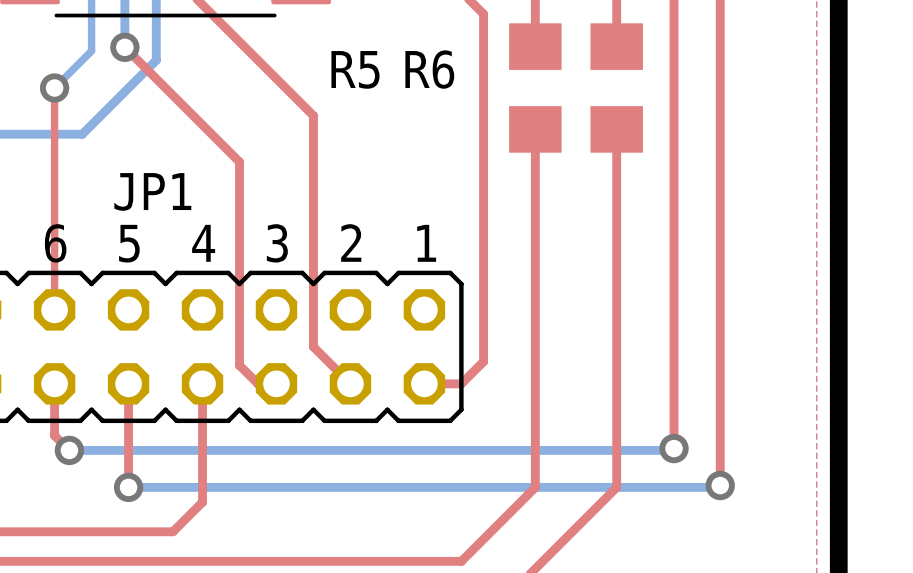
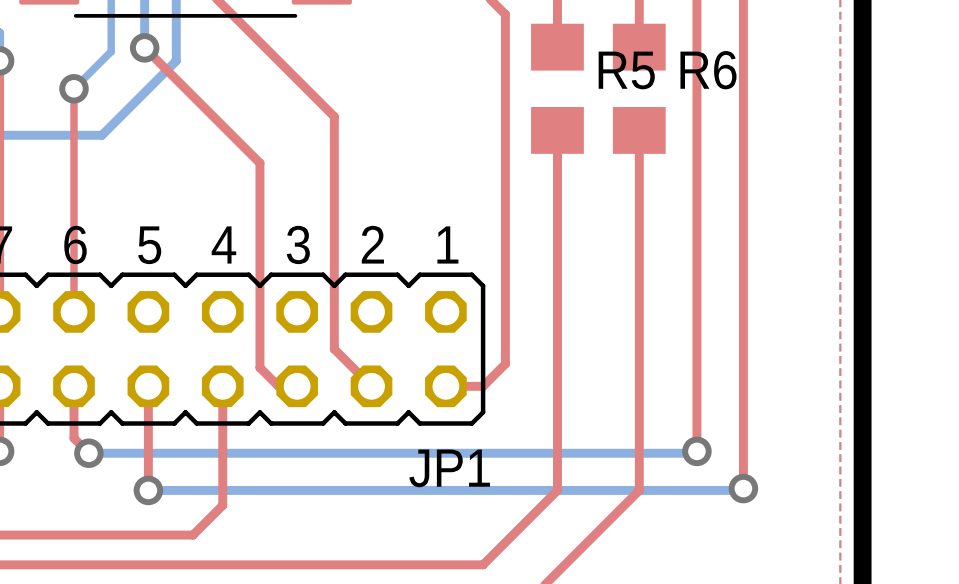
R5 name position: R5 (355, 69) -> R5 (626, 70)
R6 name position: R6 (429, 69) -> R6 (708, 70)
JP1 name position: JP1 (152, 191) -> JP1 (449, 468)

